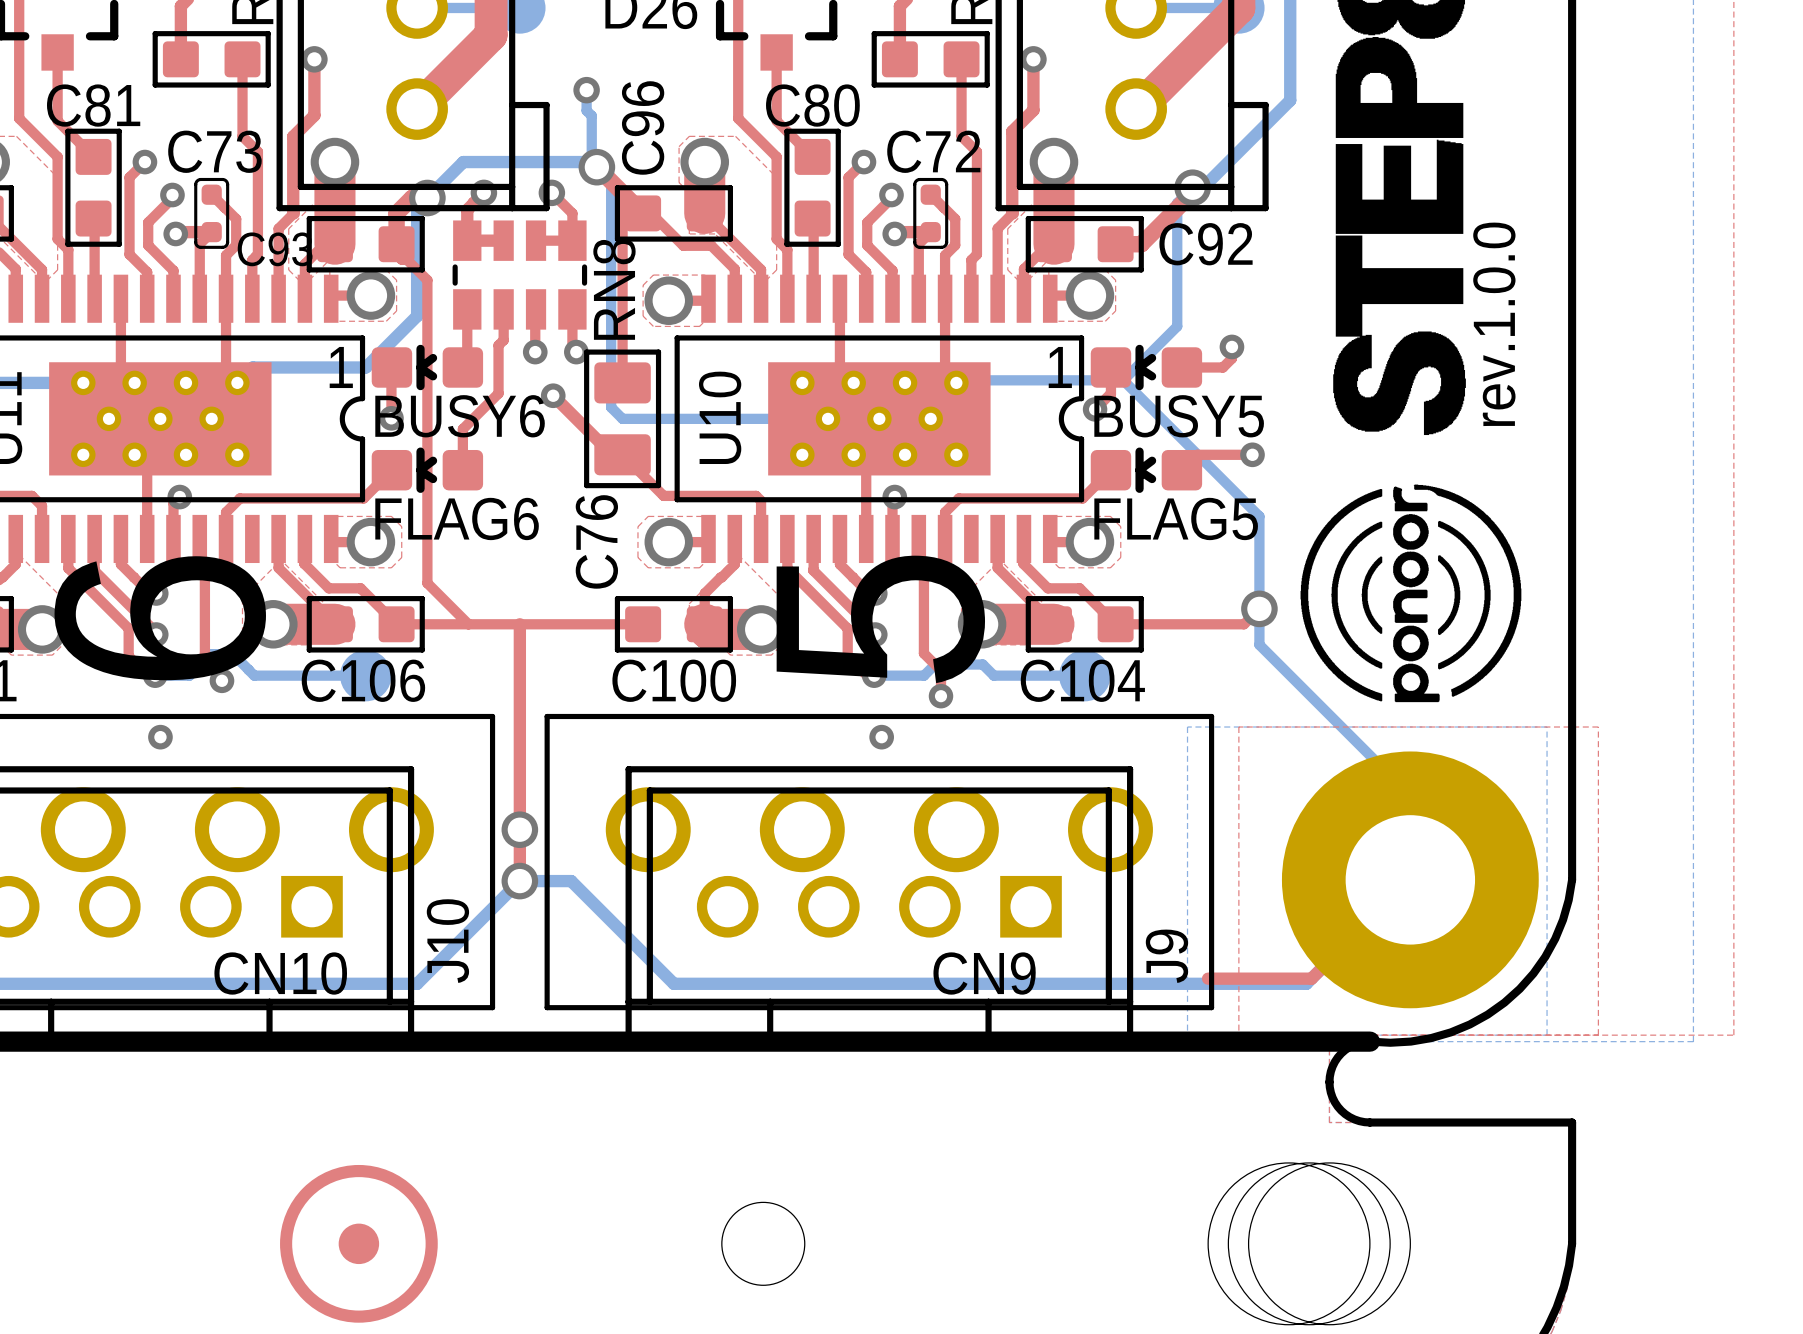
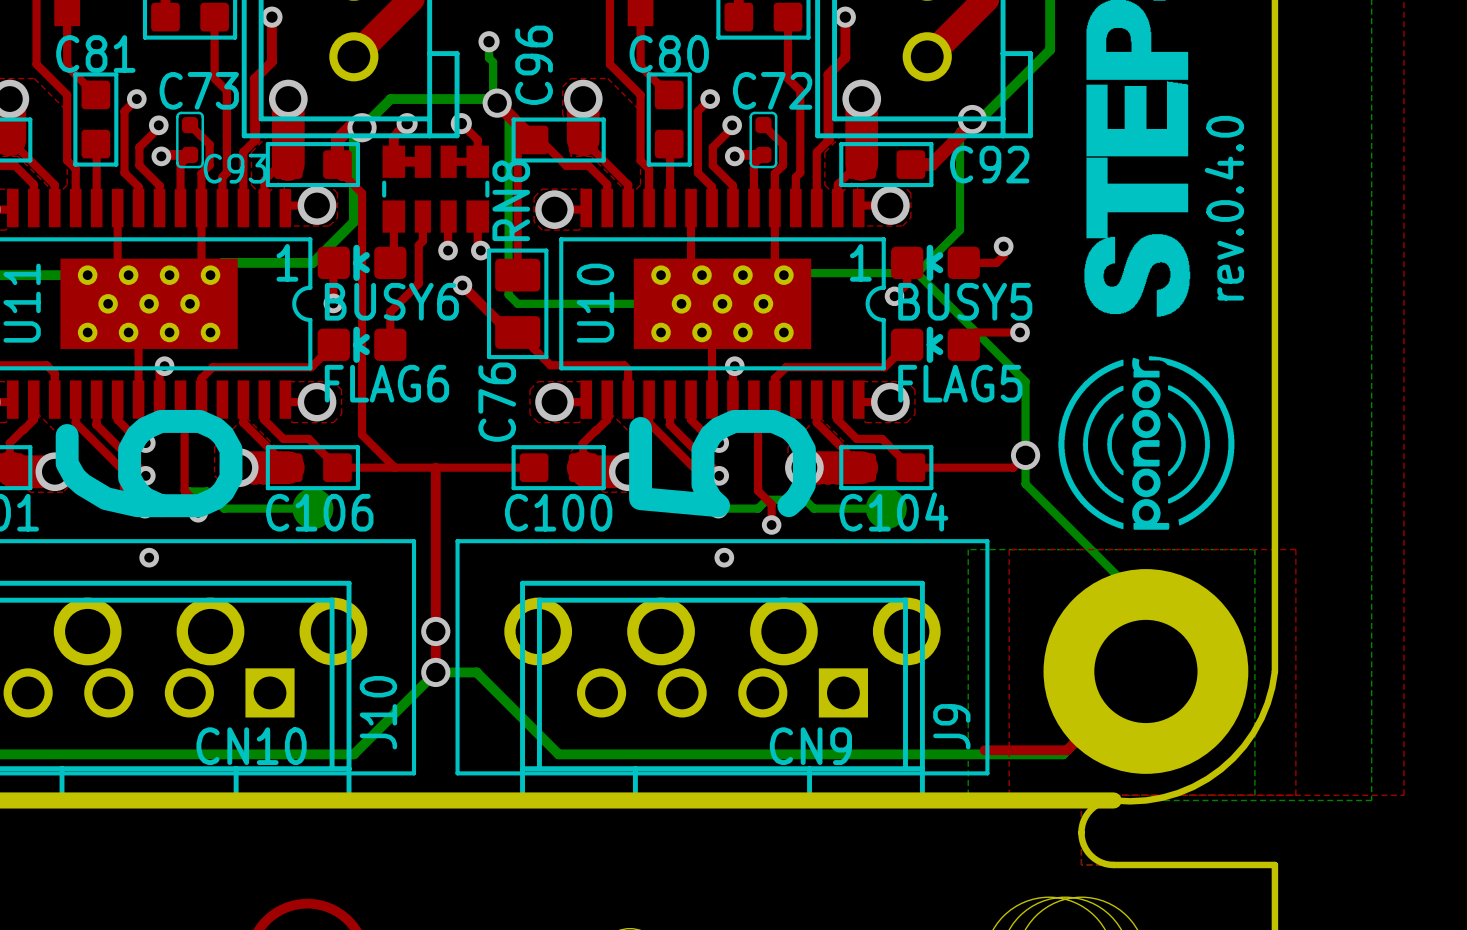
text: rev.1.0.0 (1494, 324) -> rev.0.4.0 (1224, 208)

